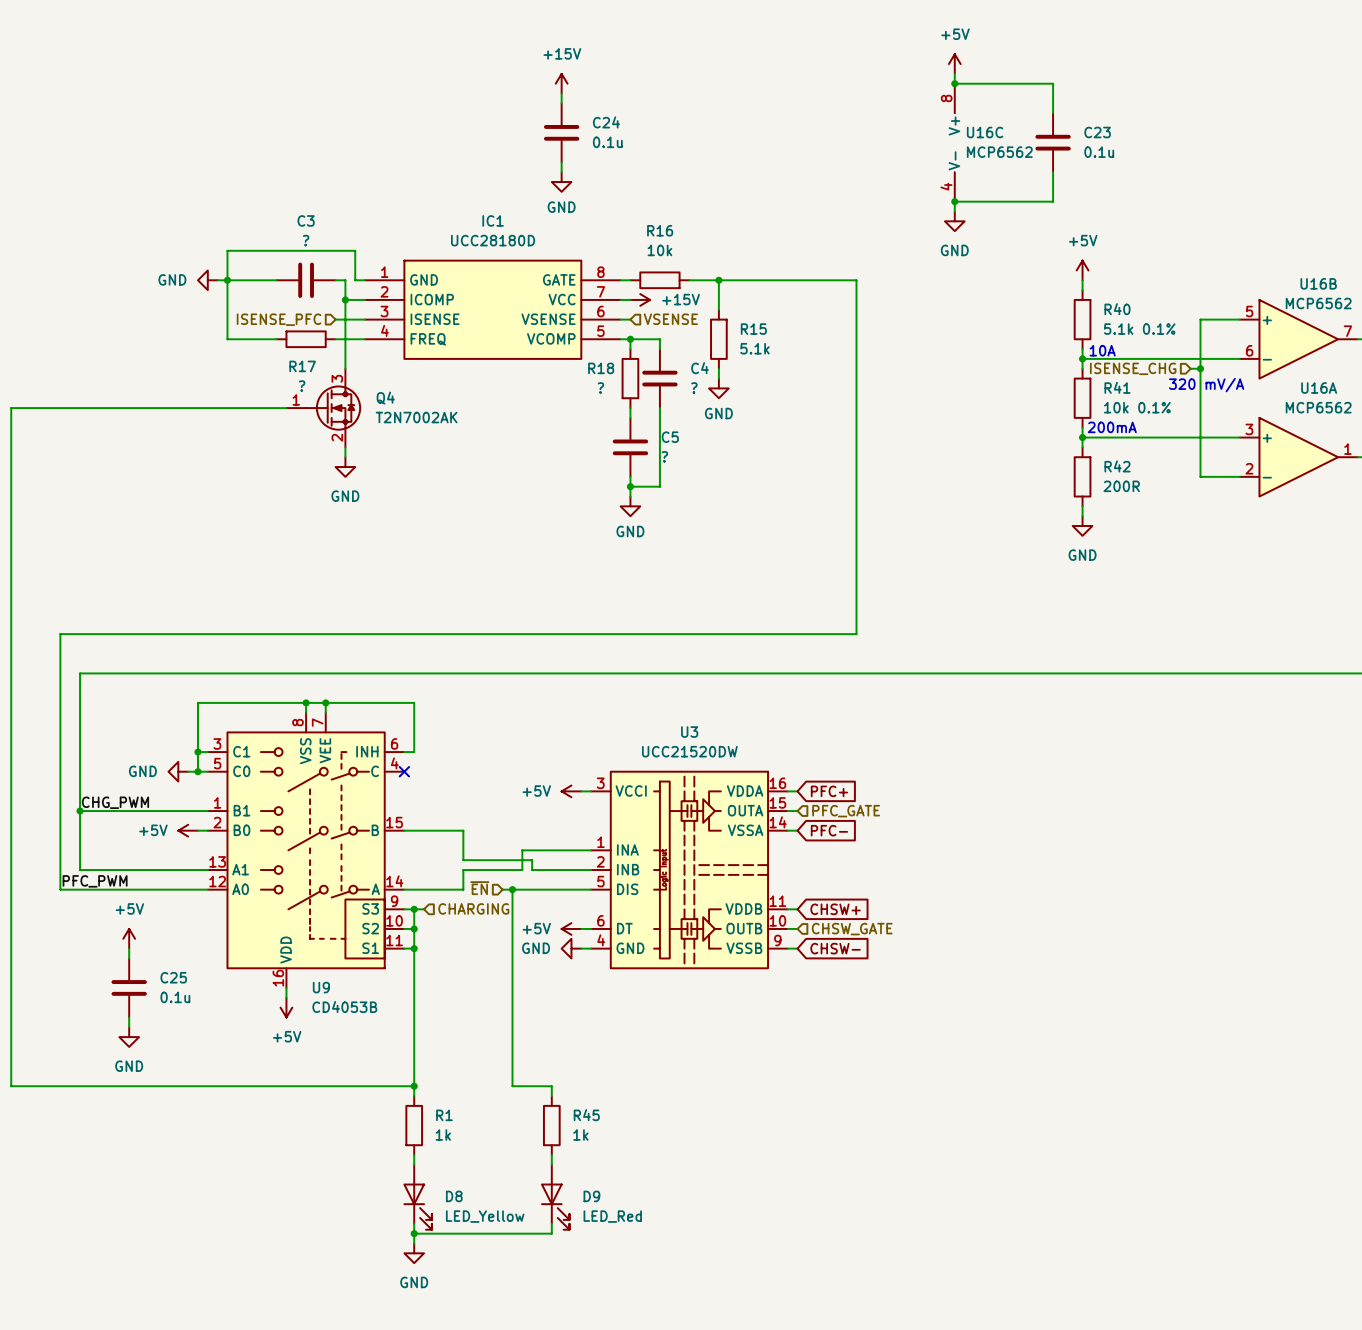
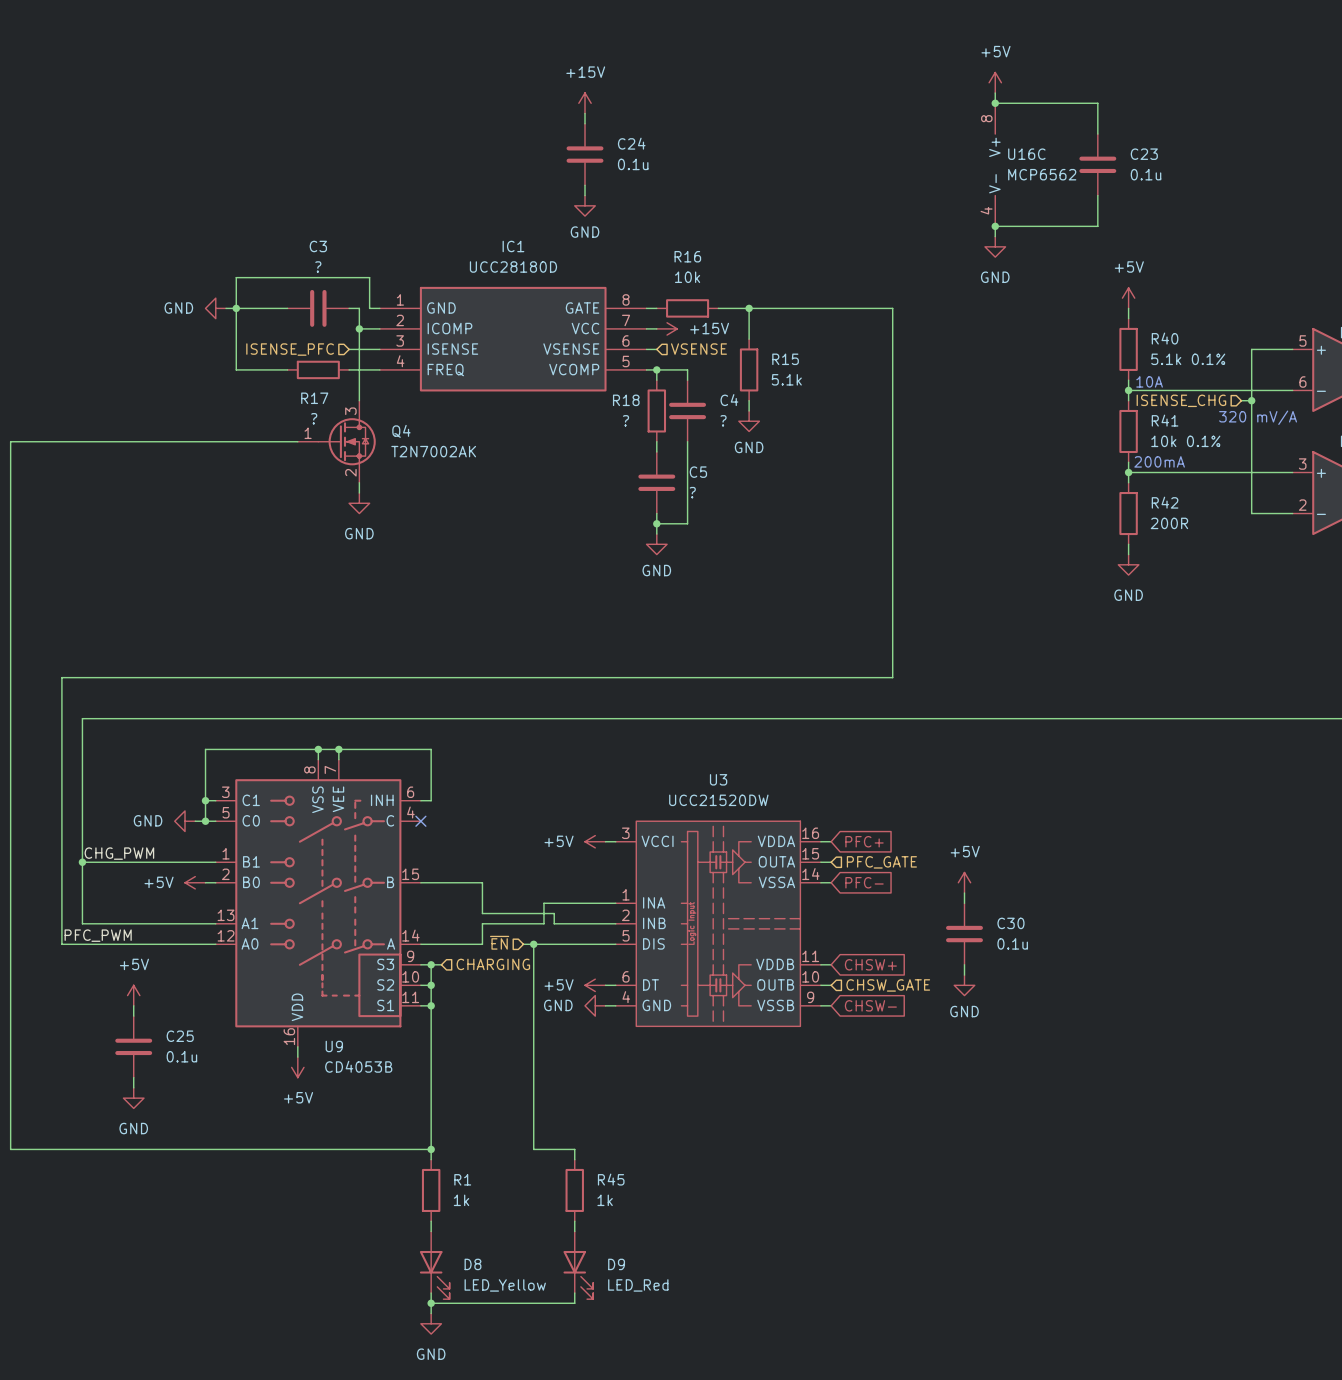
power symbol: none -> +5V (964, 882)
wire: none -> (964, 893) (964, 903)
C30: none -> 0.1u (964, 934)
wire: none -> (964, 964) (964, 975)
power symbol: none -> GND (964, 985)

